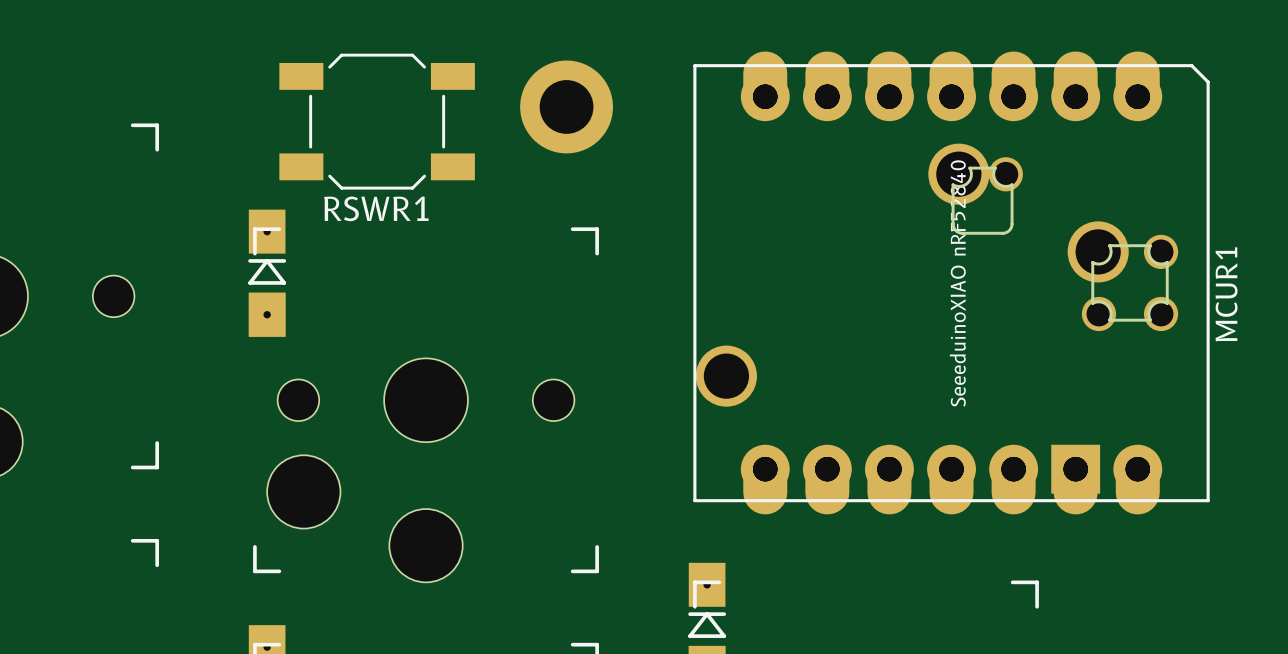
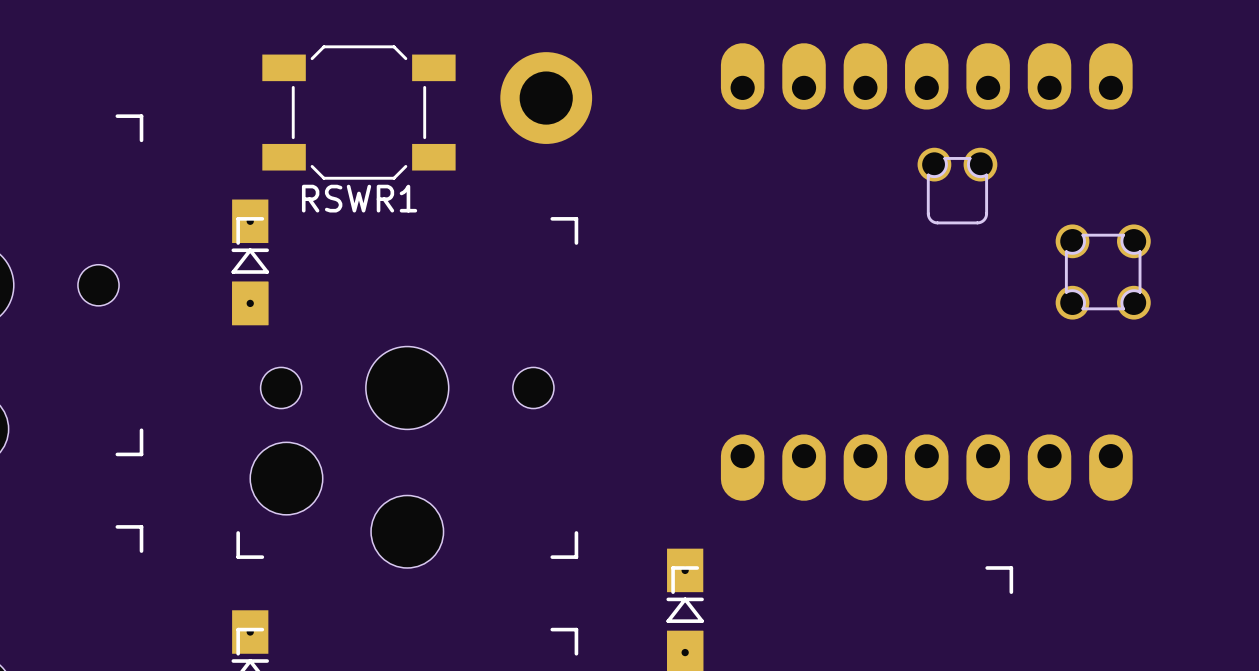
MCUR1: SeeeduinoXIAO nRF52840 (951, 283) -> none

